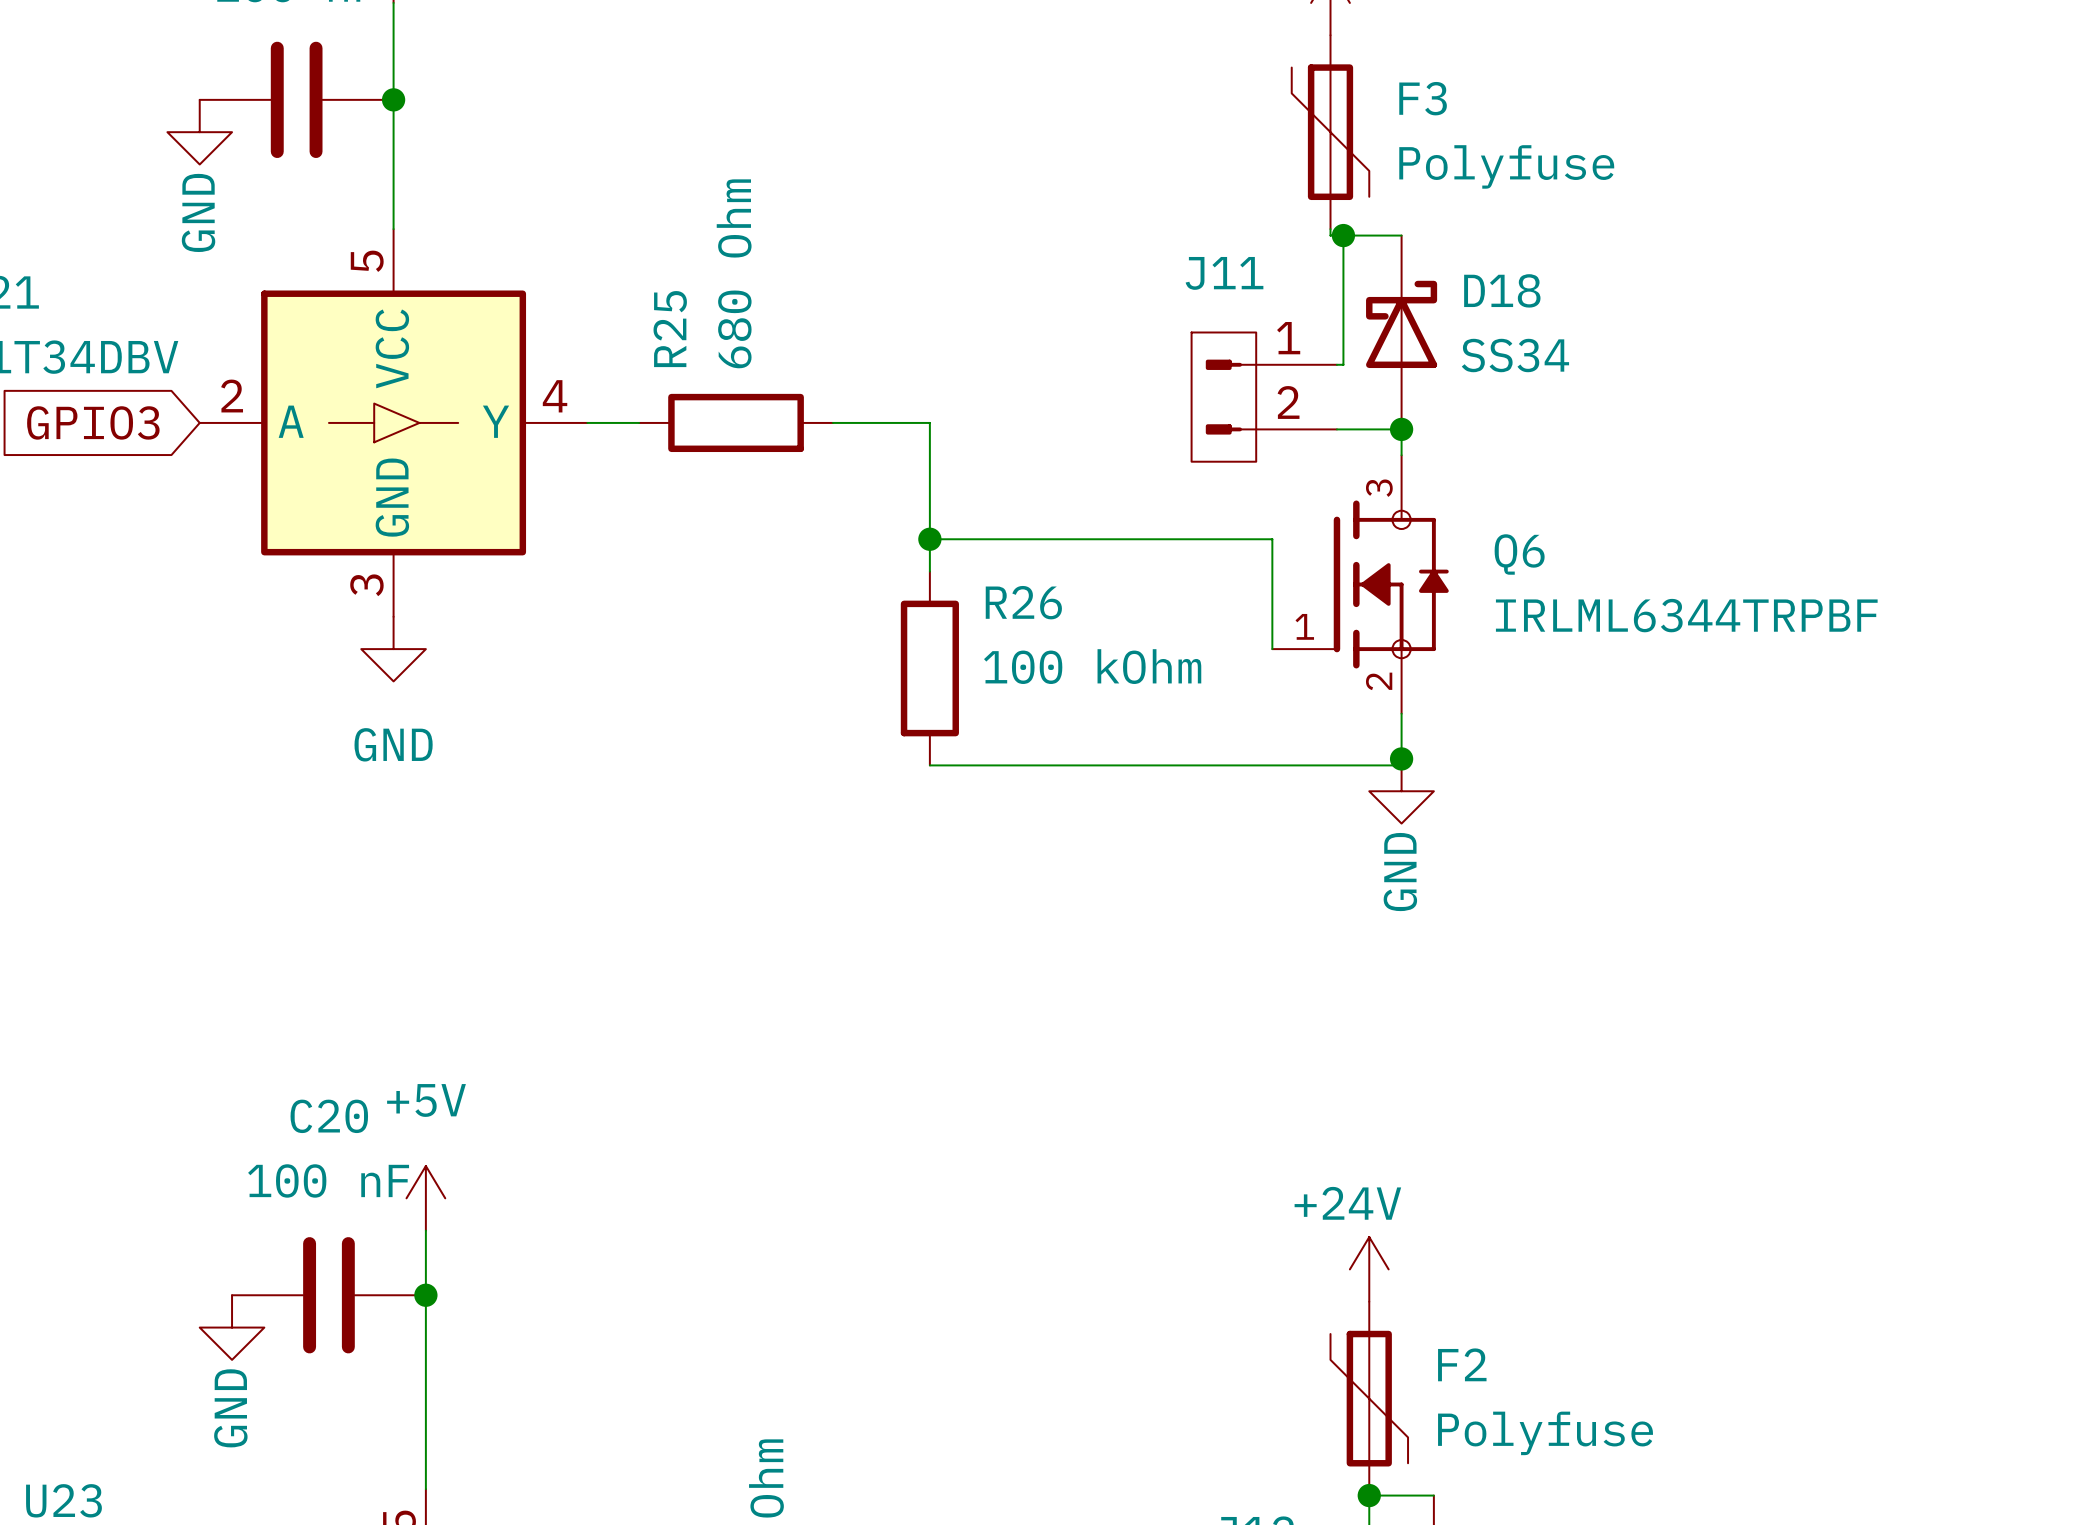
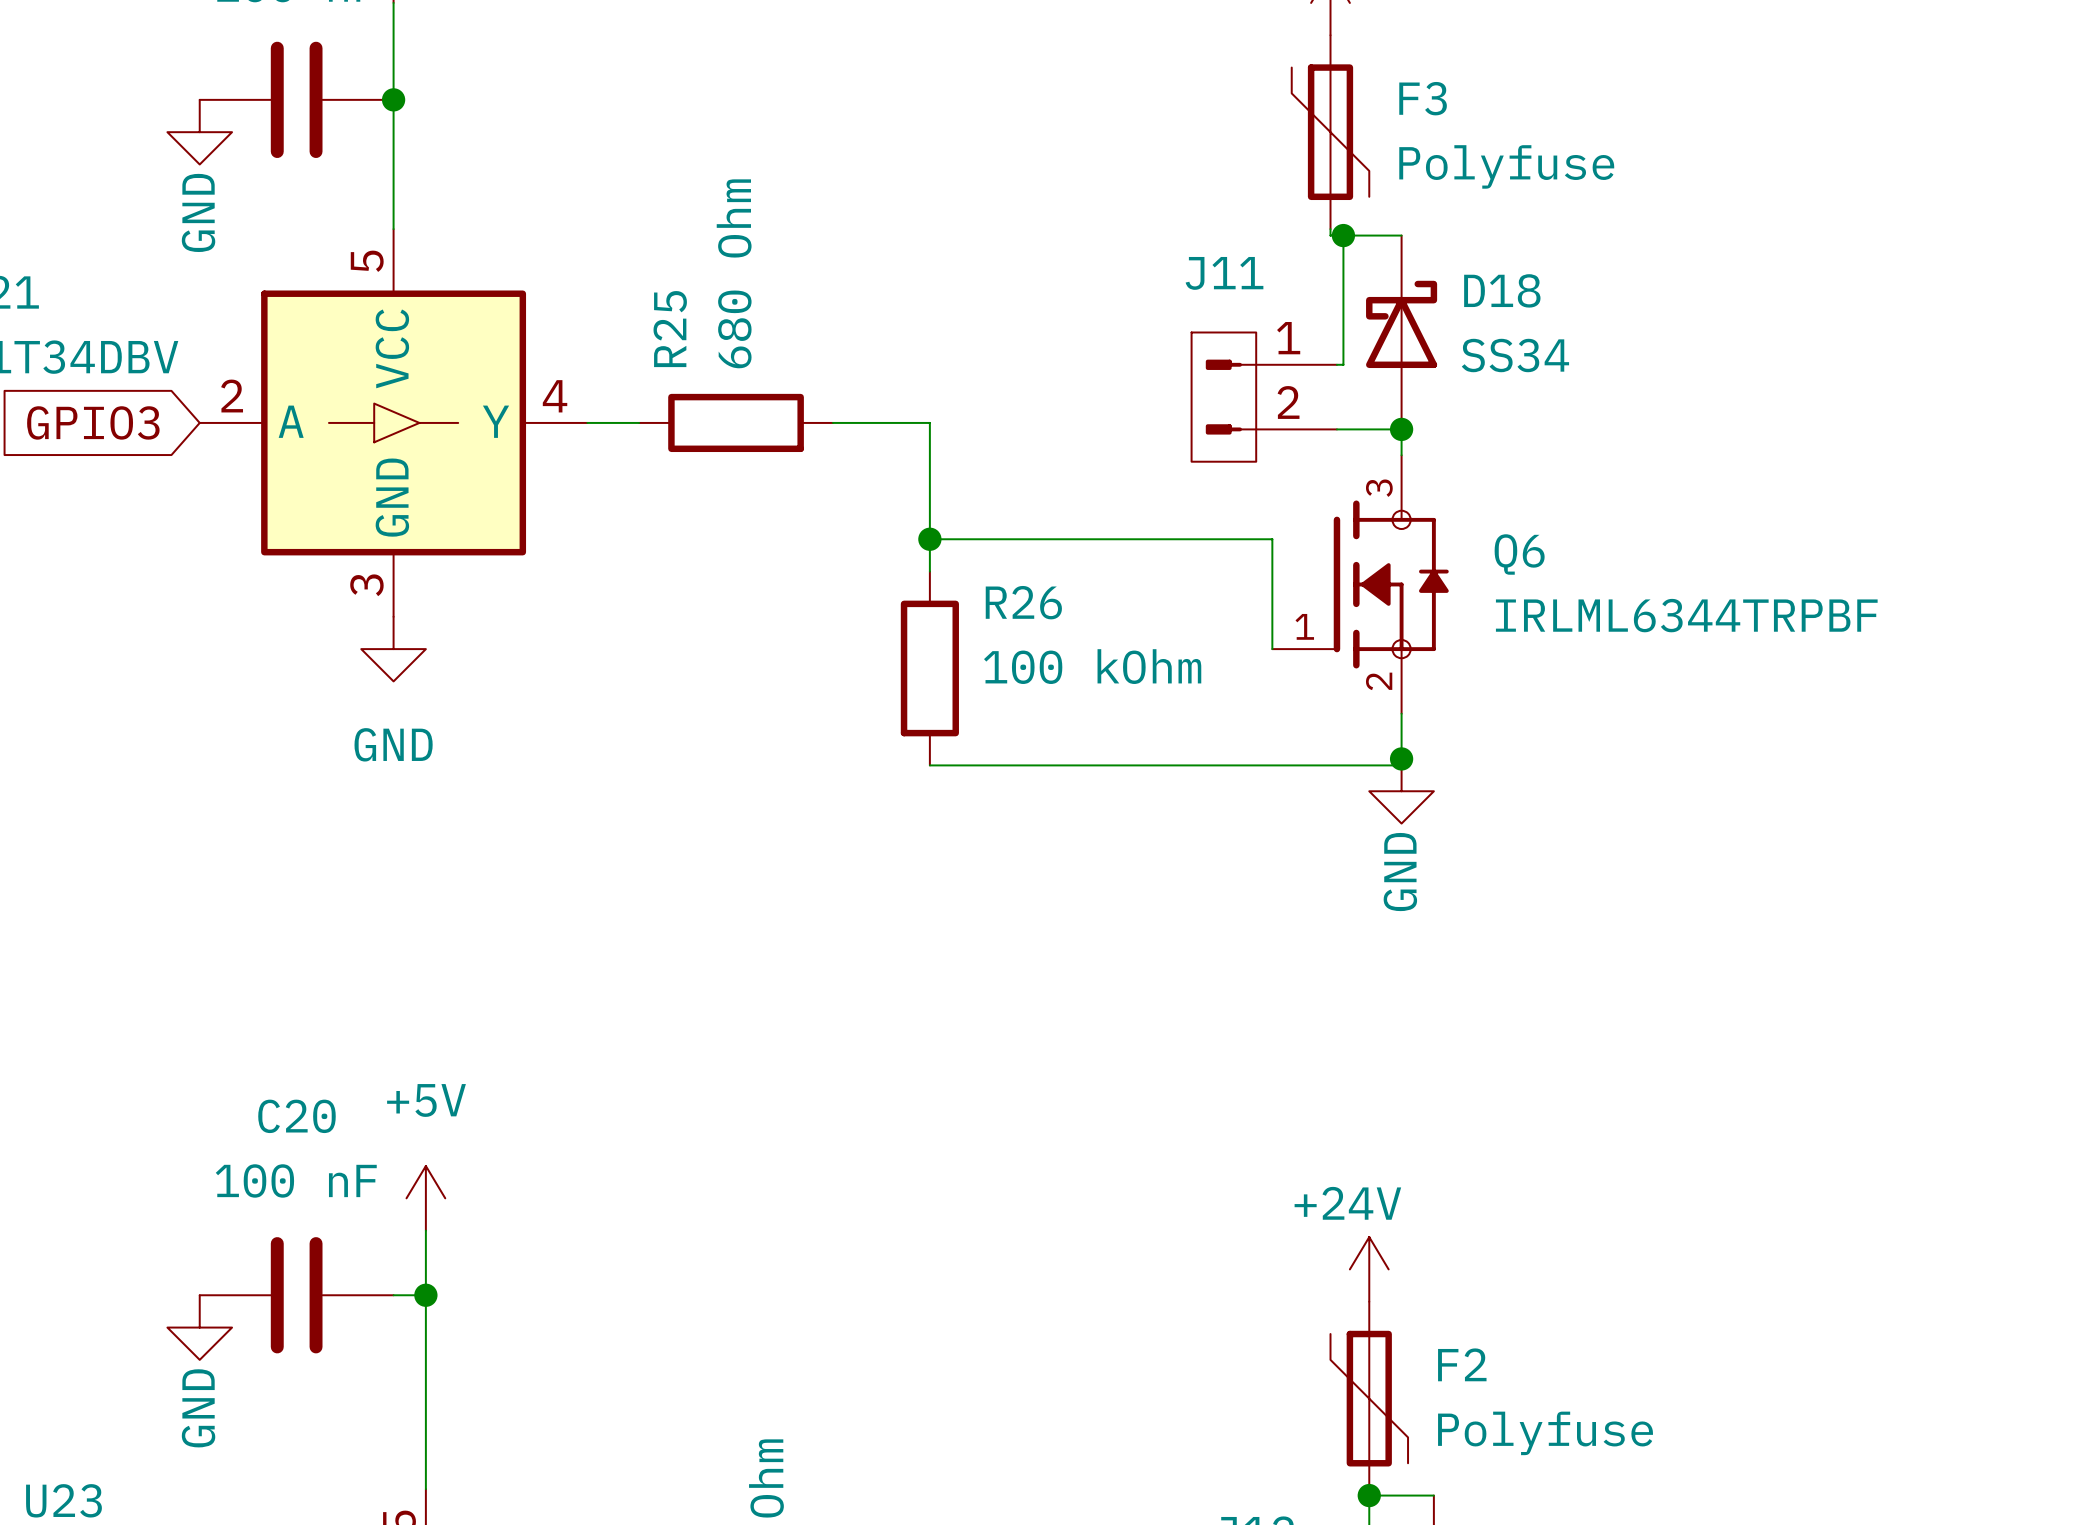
C20 position: (328, 1295) -> (296, 1295)
power symbol position: GND (232, 1327) -> GND (199, 1327)

